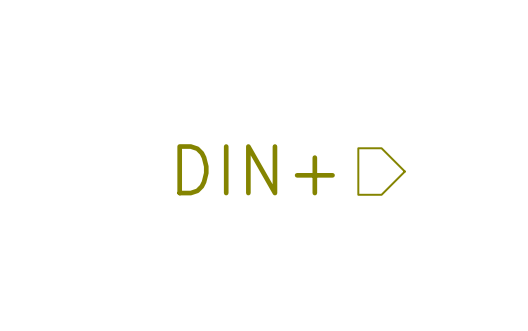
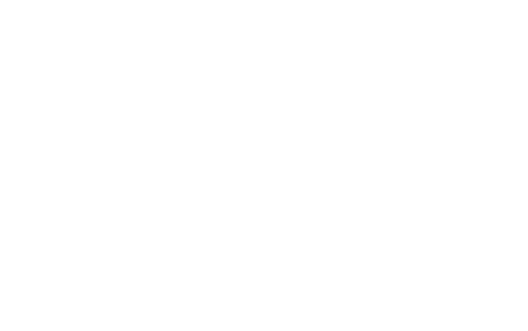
hierarchical label: DIN+ (256, 169) -> none

